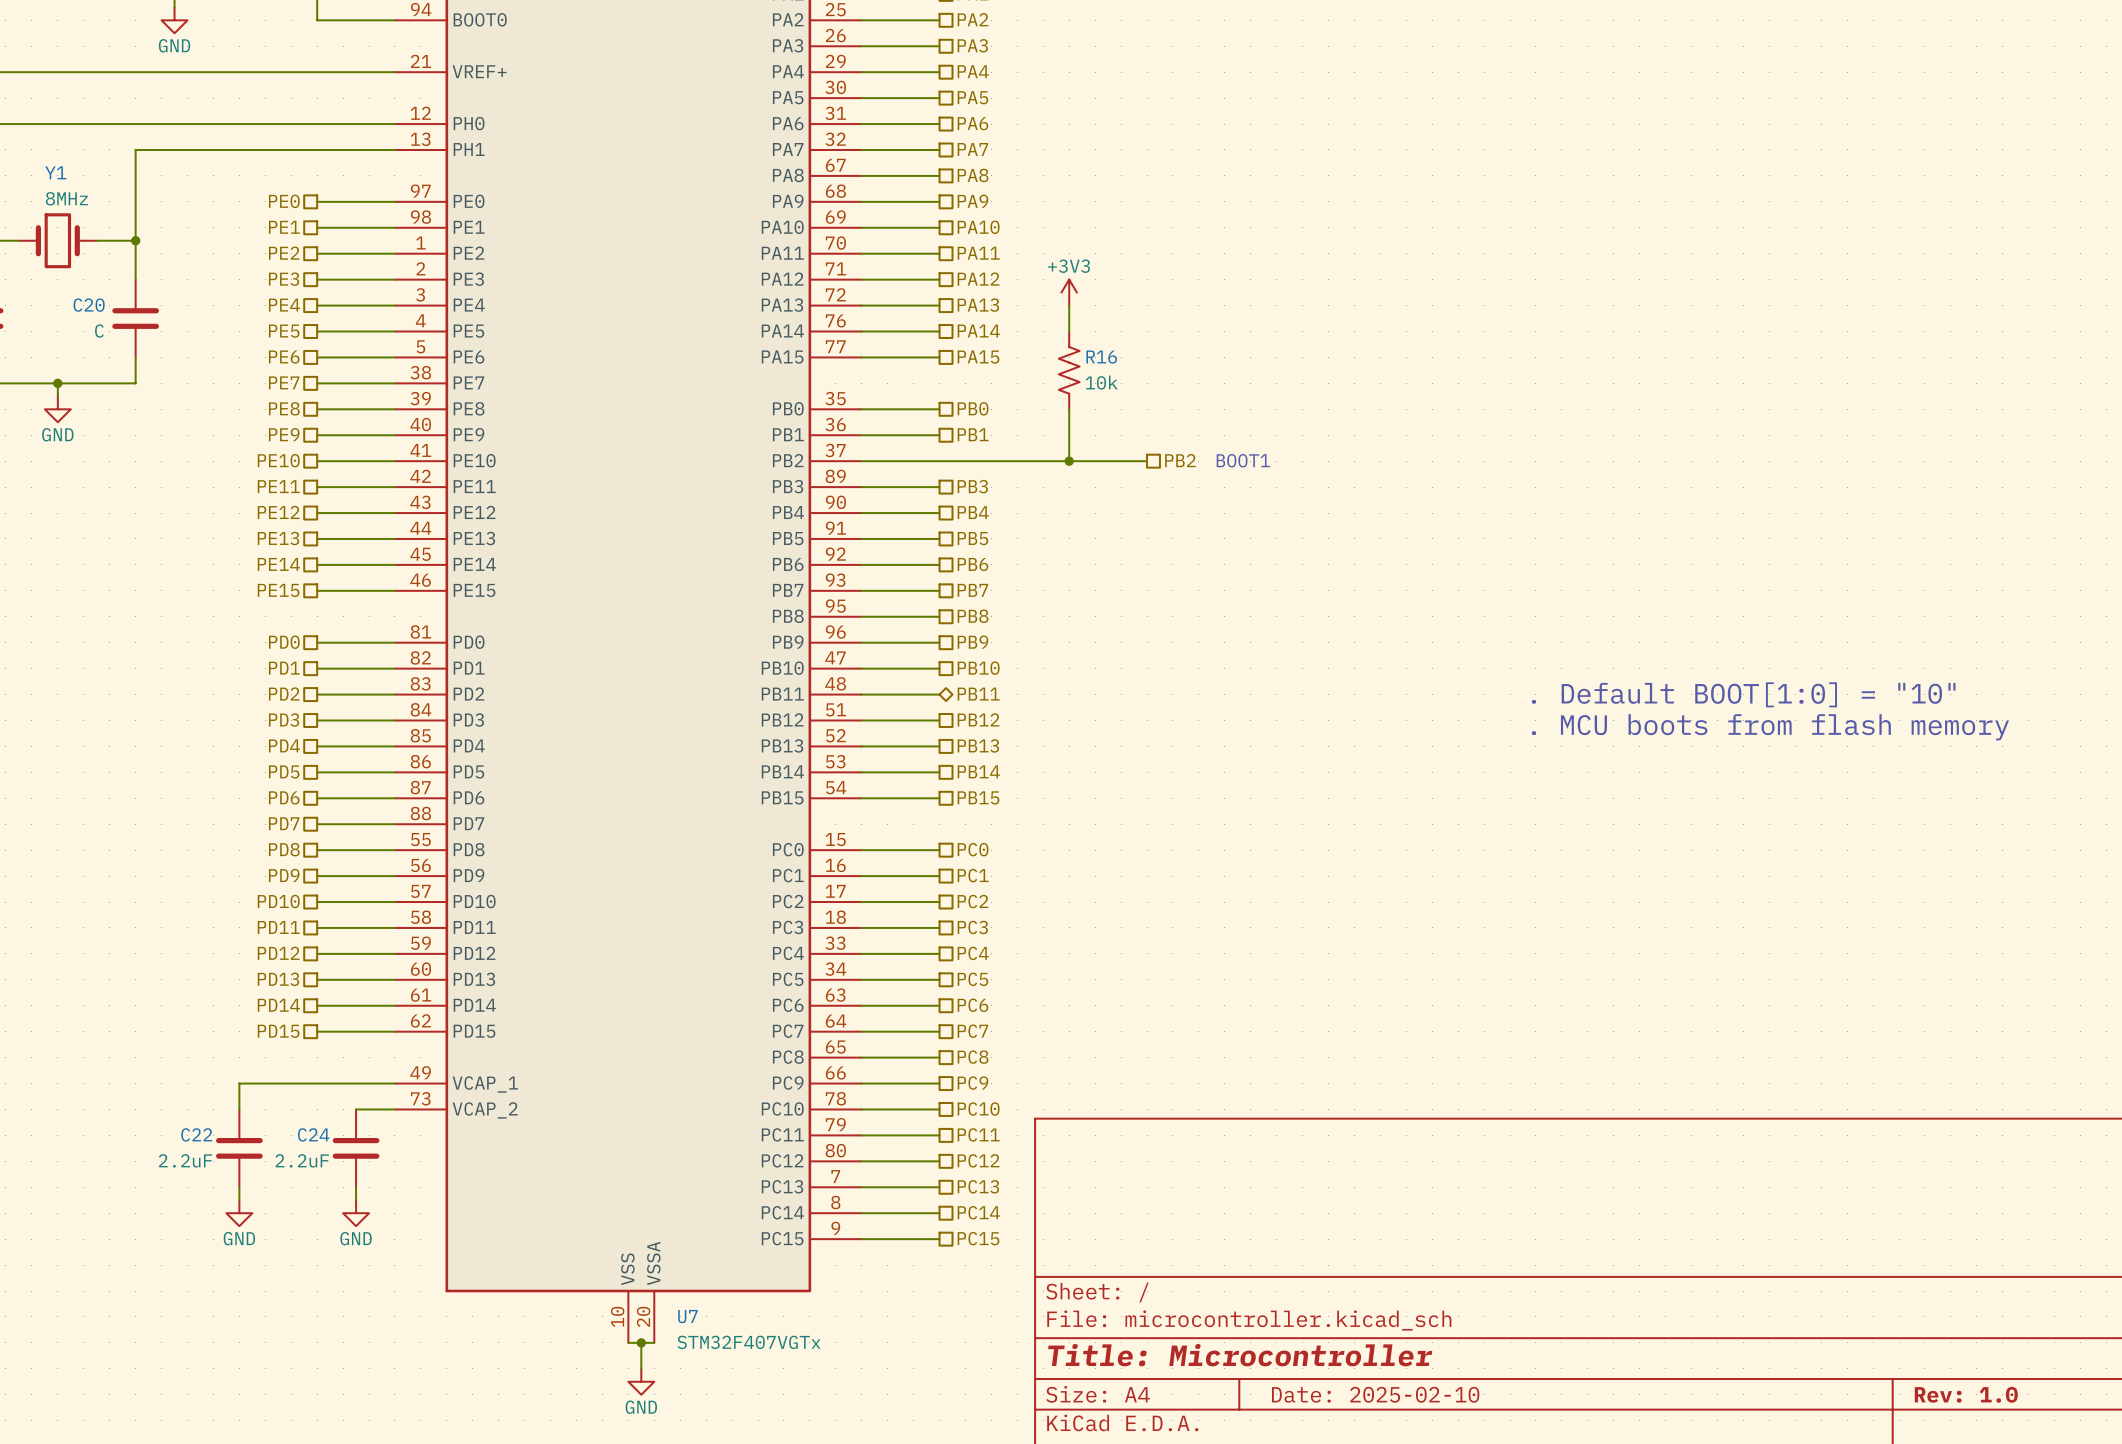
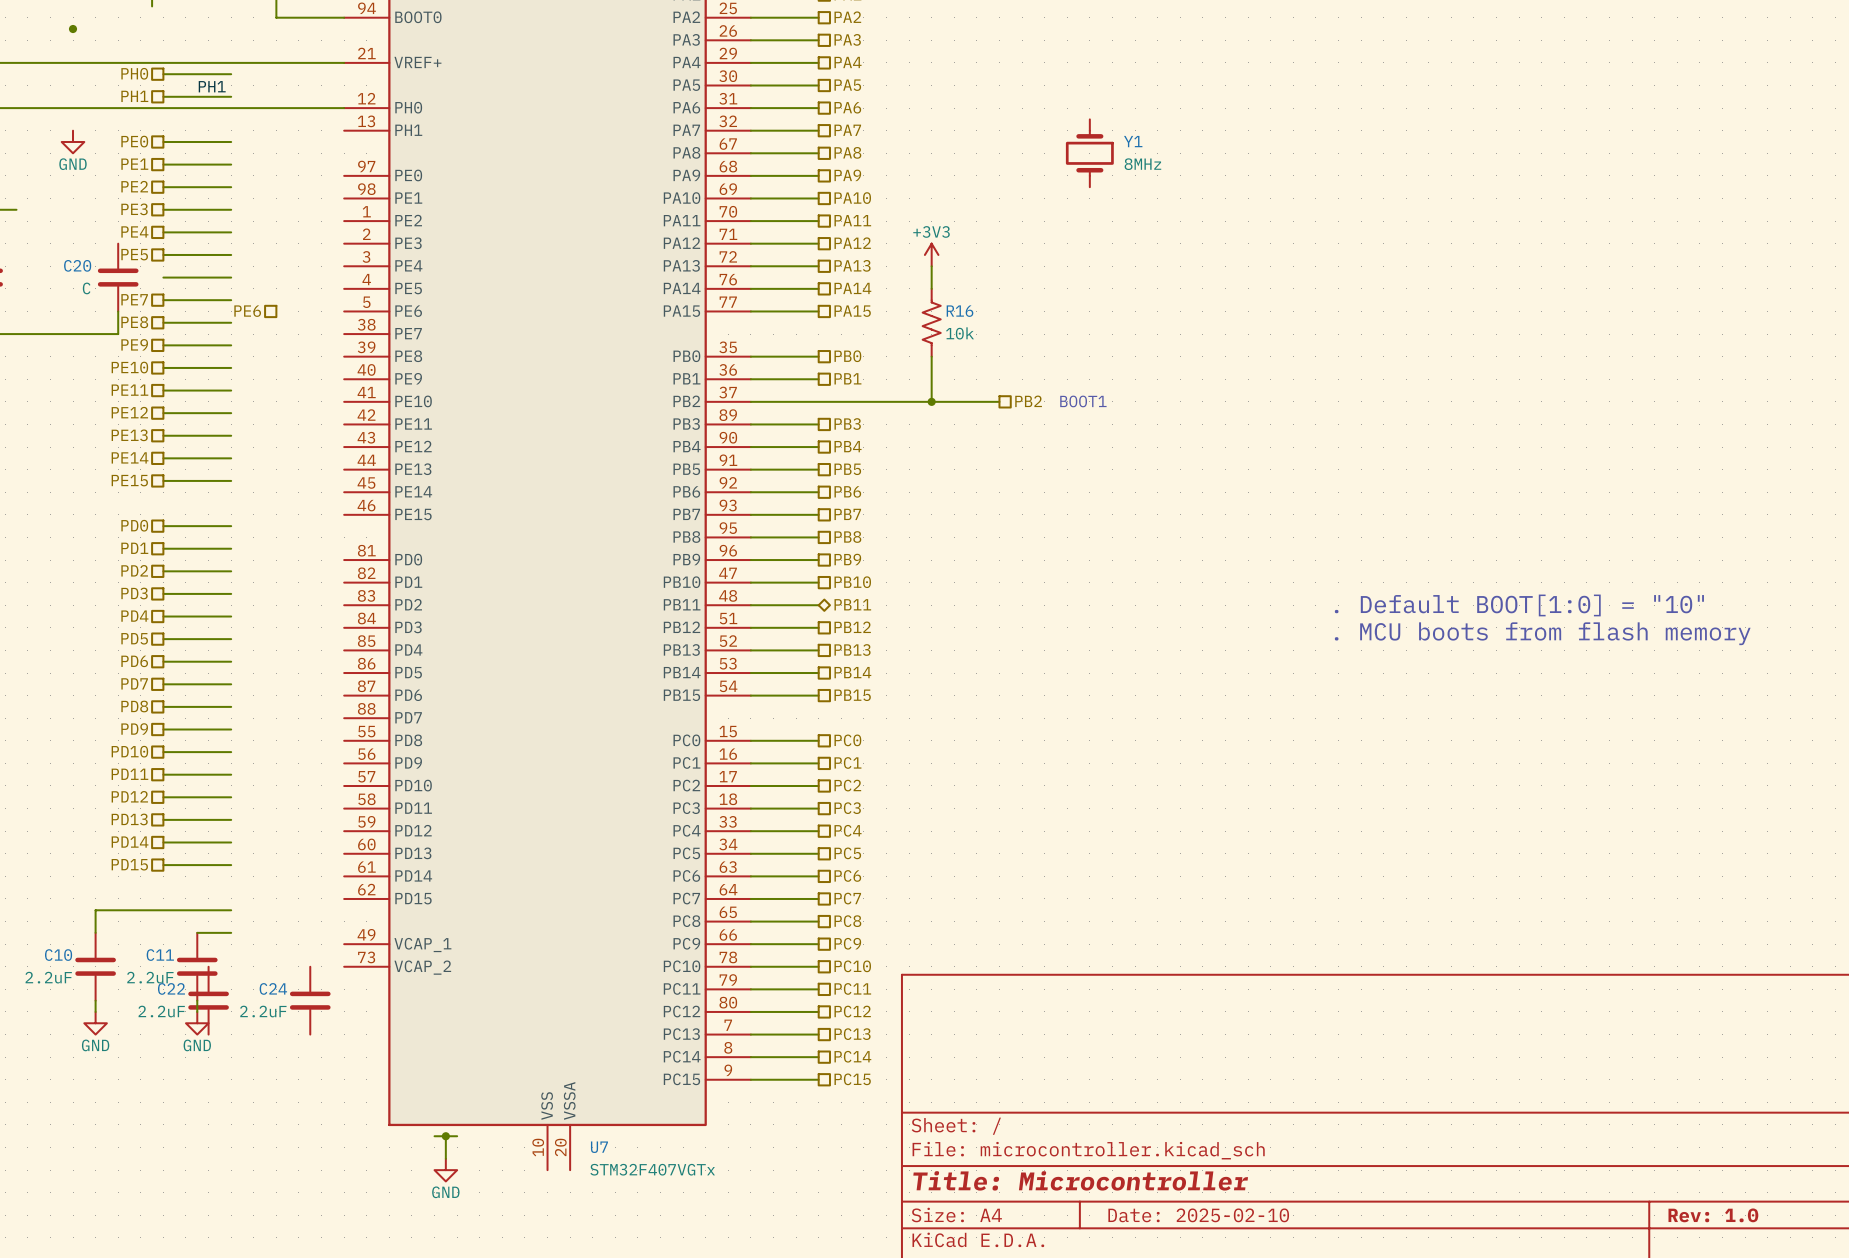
power symbol: GND (174, 20) -> none
junction: none -> (73, 29)
hierarchical label: none -> PH0 (134, 73)
wire: none -> (163, 74) (231, 74)
label: none -> PH1 (212, 86)
hierarchical label: none -> PH1 (134, 96)
wire: none -> (163, 96) (231, 96)
wire: (394, 149) (135, 149) (135, 279) -> none
power symbol: none -> GND (73, 141)
Y1 value position: 8MHz (66, 198) -> 8MHz (1142, 164)
hierarchical label position: PE0 (284, 201) -> PE0 (134, 141)
wire: (317, 201) (394, 201) -> (163, 141) (231, 141)
hierarchical label position: PE1 (284, 227) -> PE1 (134, 164)
wire: (317, 227) (394, 227) -> (163, 164) (231, 164)
Y1 rotation: 0° (57, 240) -> 90° clockwise (1089, 153)
Y1 position: (57, 240) -> (1089, 153)
wire: (96, 240) (135, 240) -> none
junction: (135, 240) -> none
hierarchical label position: PE2 (284, 253) -> PE2 (134, 186)
wire: (317, 253) (394, 253) -> (163, 187) (231, 187)
hierarchical label position: PE3 (284, 279) -> PE3 (134, 209)
wire: (317, 279) (394, 279) -> (163, 209) (231, 209)
hierarchical label position: PE4 (284, 305) -> PE4 (134, 231)
wire: (317, 305) (394, 305) -> (163, 232) (231, 232)
hierarchical label position: PE5 (284, 331) -> PE5 (134, 254)
wire: (317, 331) (394, 331) -> (163, 254) (231, 254)
wire: (317, 357) (394, 357) -> (163, 277) (231, 277)
hierarchical label position: PE7 (284, 382) -> PE7 (134, 299)
wire: (57, 383) (57, 396) -> none
junction: (57, 383) -> none
wire: (317, 383) (394, 383) -> (163, 300) (231, 300)
hierarchical label position: PE8 (284, 408) -> PE8 (134, 322)
power symbol: GND (57, 409) -> none
wire: (317, 409) (394, 409) -> (163, 322) (231, 322)
hierarchical label position: PE9 (284, 434) -> PE9 (134, 344)
wire: (317, 435) (394, 435) -> (163, 345) (231, 345)
hierarchical label position: PE10 (278, 460) -> PE10 (129, 367)
wire: (317, 461) (394, 461) -> (163, 367) (231, 367)
hierarchical label position: PE11 (278, 486) -> PE11 (129, 390)
wire: (317, 487) (394, 487) -> (163, 390) (231, 390)
hierarchical label position: PE12 (278, 512) -> PE12 (129, 412)
wire: (317, 513) (394, 513) -> (163, 413) (231, 413)
hierarchical label position: PE13 (278, 538) -> PE13 (129, 435)
wire: (317, 538) (394, 538) -> (163, 435) (231, 435)
hierarchical label position: PE14 (278, 564) -> PE14 (130, 457)
wire: (317, 564) (394, 564) -> (163, 458) (231, 458)
hierarchical label position: PE15 (278, 590) -> PE15 (129, 480)
wire: (317, 590) (394, 590) -> (163, 480) (231, 480)
hierarchical label position: PD0 (284, 642) -> PD0 (134, 525)
wire: (317, 642) (394, 642) -> (163, 526) (231, 526)
hierarchical label position: PD1 (284, 668) -> PD1 (134, 548)
wire: (317, 668) (394, 668) -> (163, 548) (231, 548)
hierarchical label position: PD2 (284, 693) -> PD2 (134, 570)
wire: (317, 694) (394, 694) -> (163, 571) (231, 571)
hierarchical label position: PD3 (284, 720) -> PD3 (134, 593)
wire: (317, 720) (394, 720) -> (163, 593) (231, 593)
hierarchical label position: PD4 (284, 745) -> PD4 (134, 616)
wire: (317, 746) (394, 746) -> (163, 616) (231, 616)
hierarchical label position: PD5 (284, 771) -> PD5 (134, 638)
wire: (317, 772) (394, 772) -> (163, 639) (231, 639)
hierarchical label position: PD6 (284, 797) -> PD6 (134, 661)
wire: (317, 798) (394, 798) -> (163, 661) (231, 661)
hierarchical label position: PD7 (284, 823) -> PD7 (134, 683)
wire: (317, 824) (394, 824) -> (163, 684) (231, 684)
hierarchical label position: PD8 (284, 849) -> PD8 (134, 706)
wire: (317, 850) (394, 850) -> (163, 706) (231, 706)
hierarchical label position: PD9 (284, 875) -> PD9 (134, 728)
wire: (317, 876) (394, 876) -> (163, 729) (231, 729)
hierarchical label position: PD10 (278, 901) -> PD10 (129, 751)
wire: (317, 902) (394, 902) -> (163, 752) (231, 752)
hierarchical label position: PD11 (278, 927) -> PD11 (129, 774)
wire: (317, 927) (394, 927) -> (163, 774) (231, 774)
hierarchical label position: PD12 (278, 953) -> PD12 (129, 796)
wire: (317, 953) (394, 953) -> (163, 797) (231, 797)
hierarchical label position: PD13 (278, 979) -> PD13 (129, 819)
wire: (317, 979) (394, 979) -> (163, 819) (231, 819)
hierarchical label position: PD14 (278, 1005) -> PD14 (130, 842)
wire: (317, 1005) (394, 1005) -> (163, 842) (231, 842)
hierarchical label position: PD15 (278, 1031) -> PD15 (129, 864)
wire: (317, 1031) (394, 1031) -> (163, 865) (231, 865)
wire: (394, 1083) (239, 1083) (239, 1109) -> (231, 910) (95, 910) (95, 932)
C10: none -> 2.2uF (95, 966)
C11: none -> 2.2uF (197, 966)
wire: (356, 1109) (394, 1109) -> (197, 932) (231, 932)
power symbol: none -> GND (95, 1023)
wire: (239, 1187) (239, 1200) -> (95, 1000) (95, 1011)
wire: (356, 1187) (356, 1200) -> (197, 1000) (197, 1011)
power symbol position: GND (239, 1213) -> GND (197, 1023)
power symbol: GND (356, 1213) -> none
junction: none -> (445, 1136)
power symbol: none -> GND (445, 1170)
wire: (628, 1342) (654, 1342) -> (434, 1136) (457, 1136)
wire: (641, 1342) (641, 1368) -> (445, 1136) (445, 1158)
junction: (641, 1342) -> none
power symbol: GND (641, 1381) -> none

